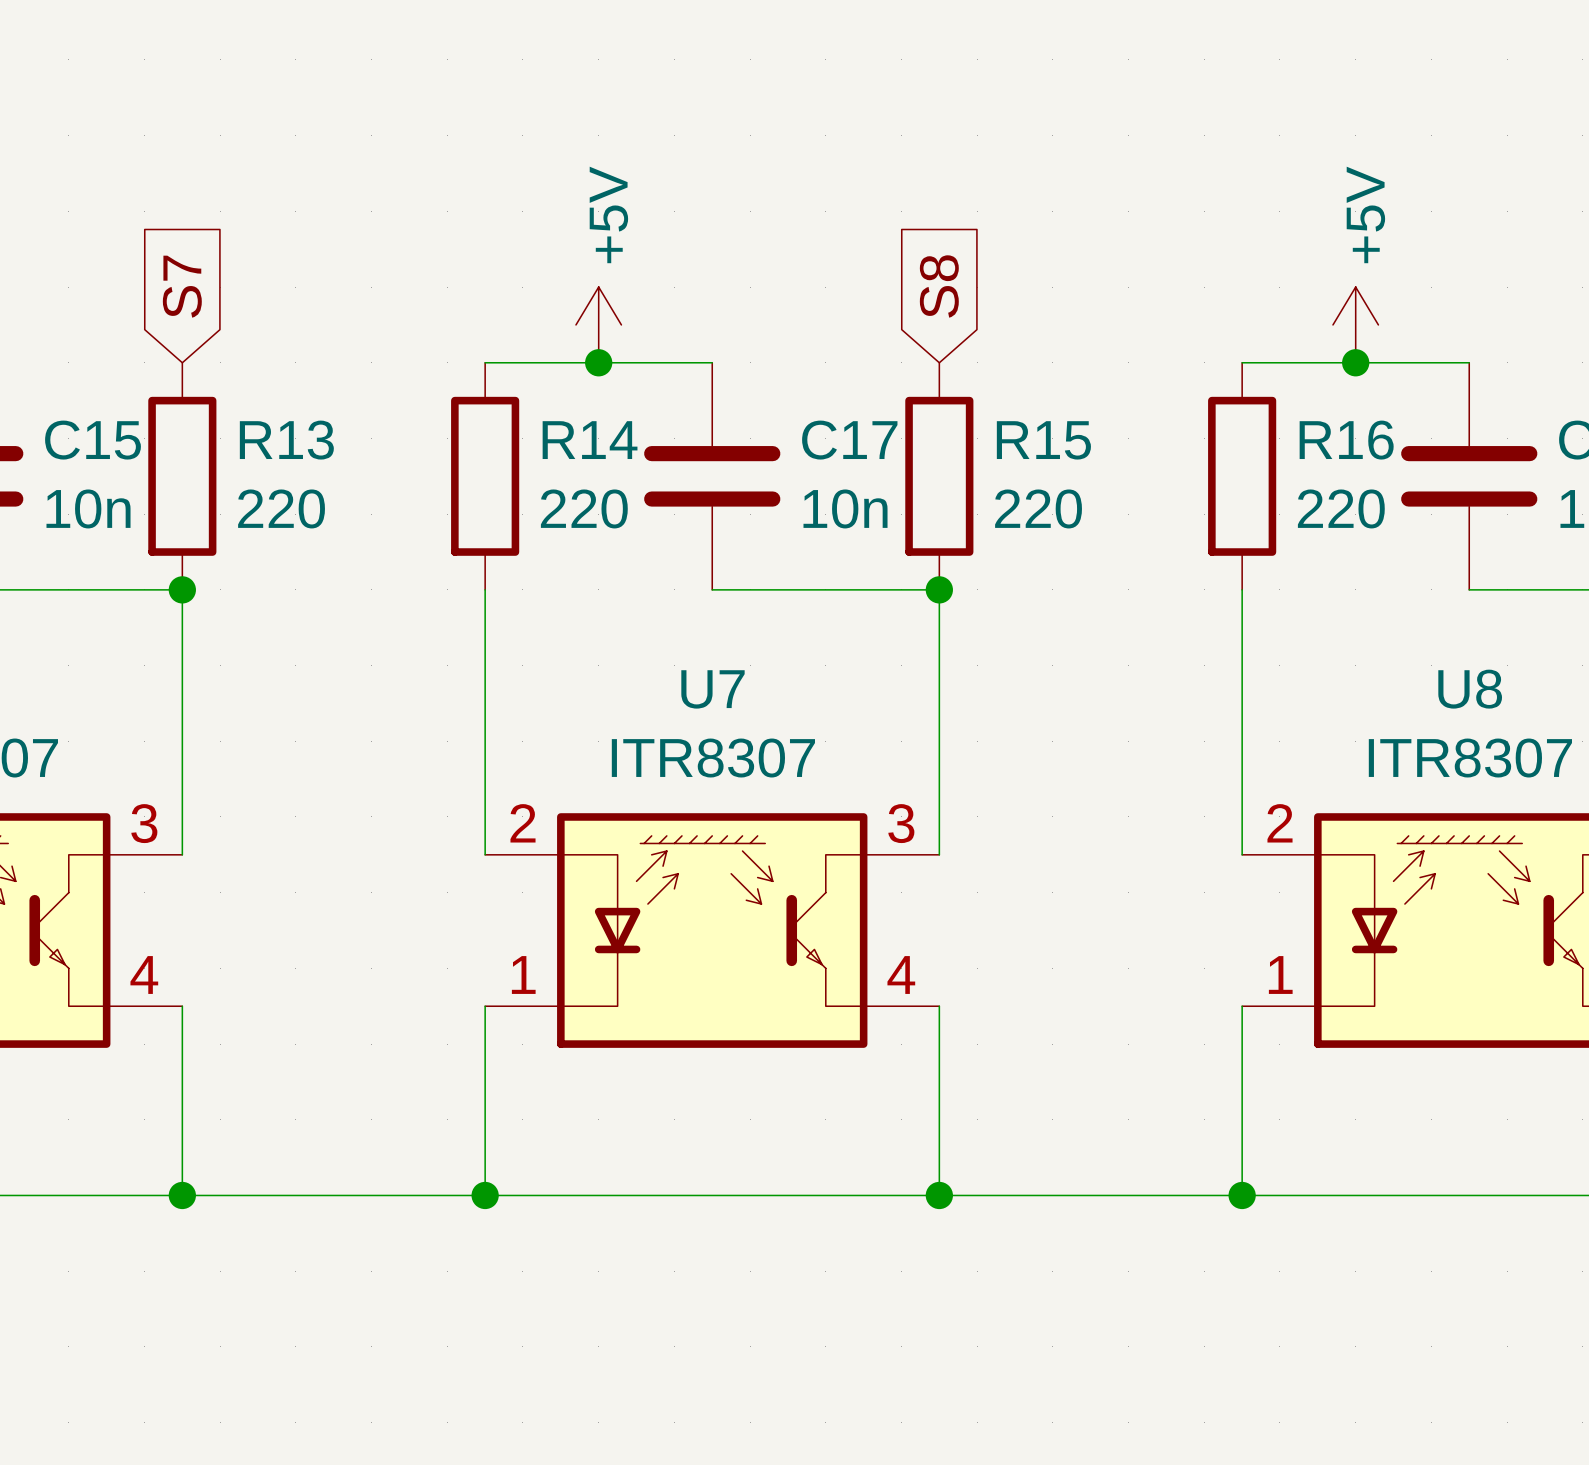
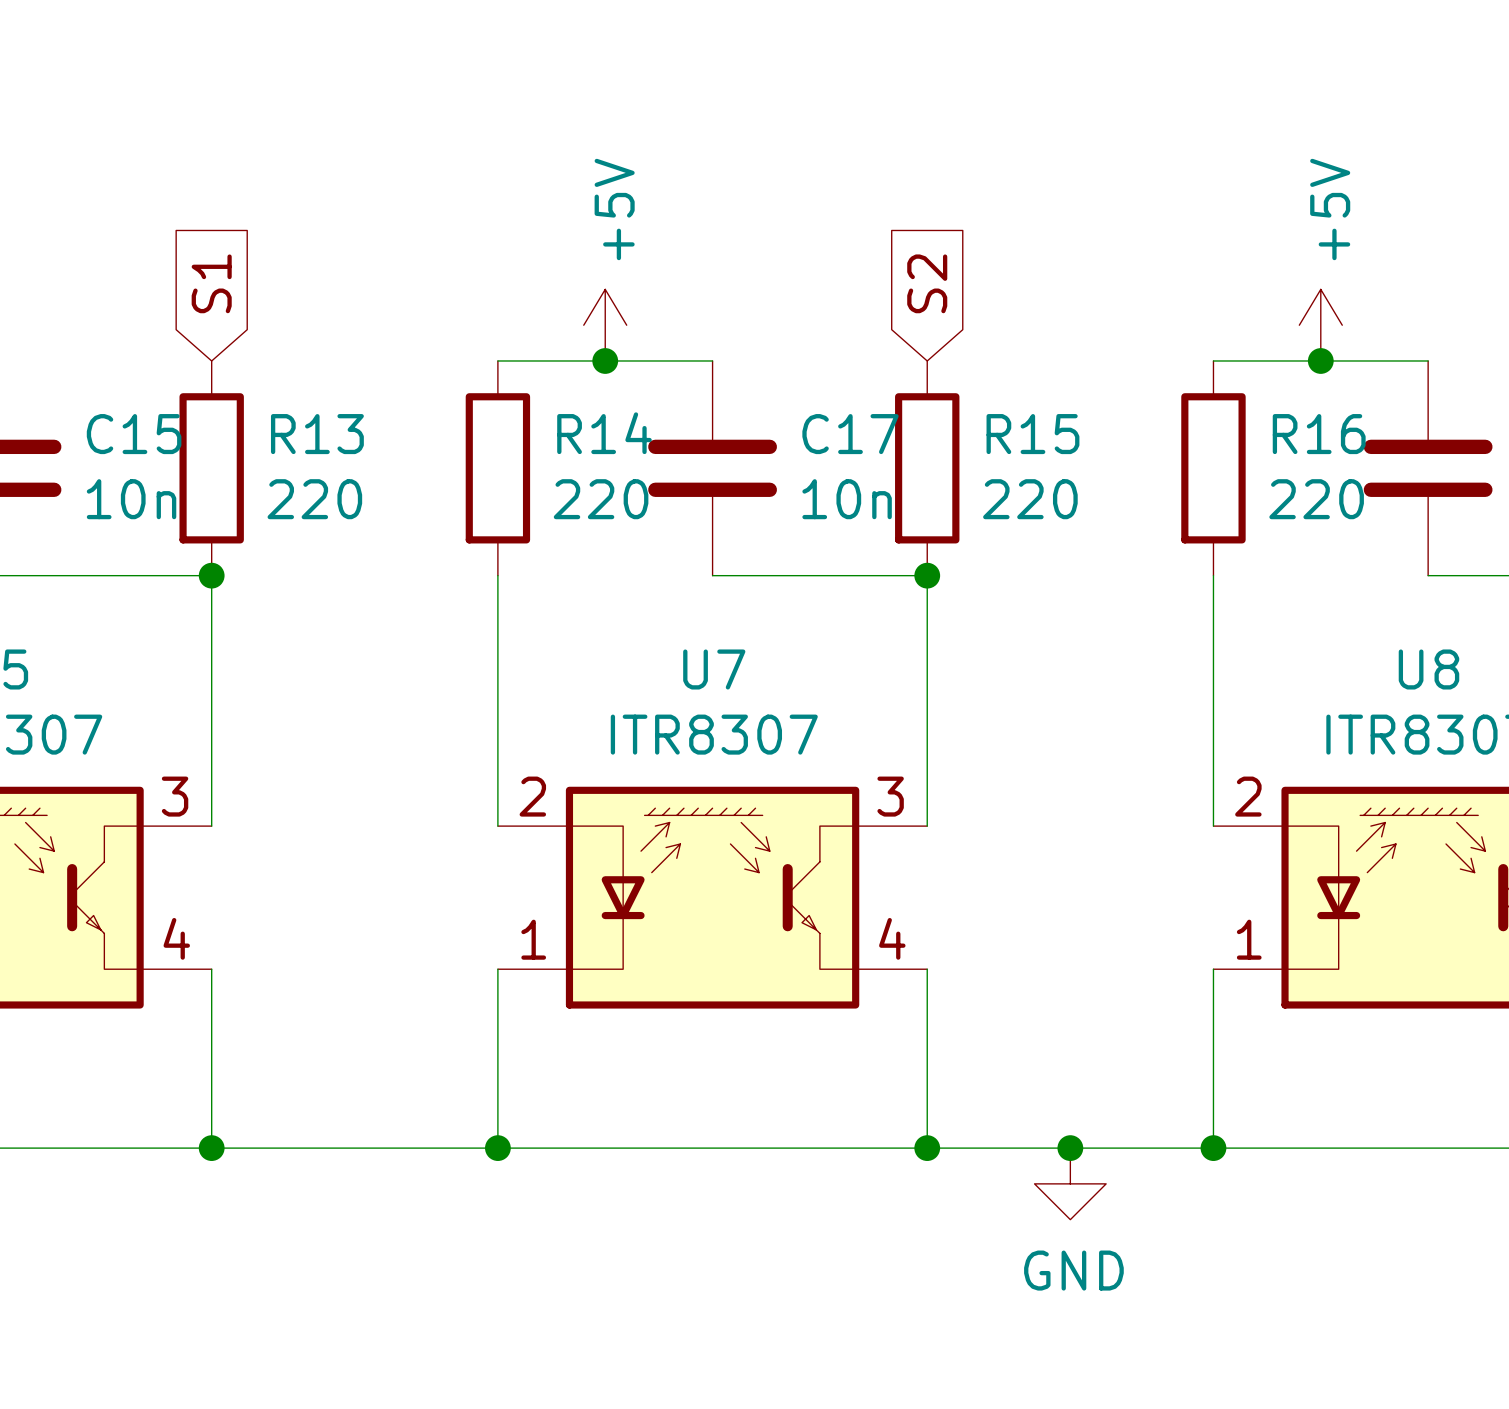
global label: S7 (182, 286) -> S1 (211, 283)
global label: S8 (939, 286) -> S2 (927, 283)
junction: none -> (1070, 1148)
power symbol: none -> GND (1070, 1183)

